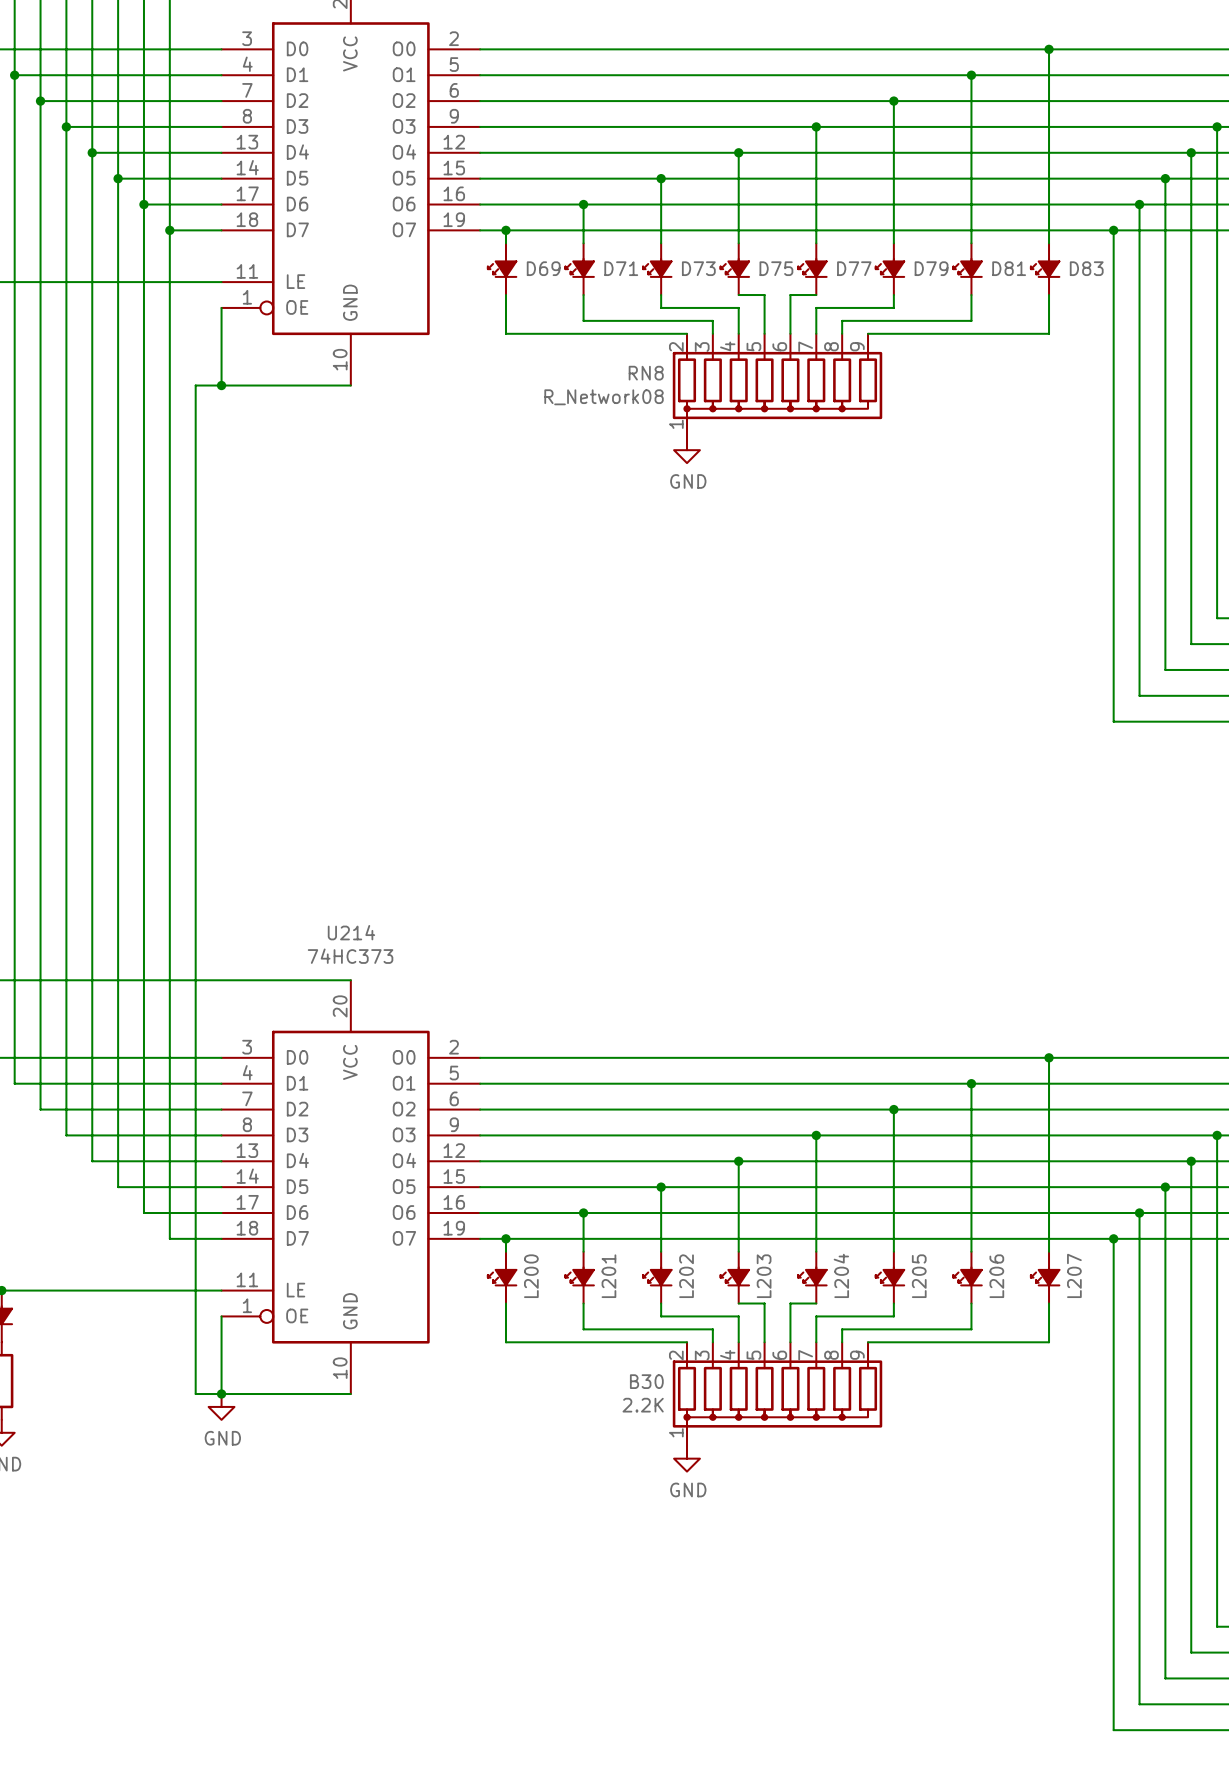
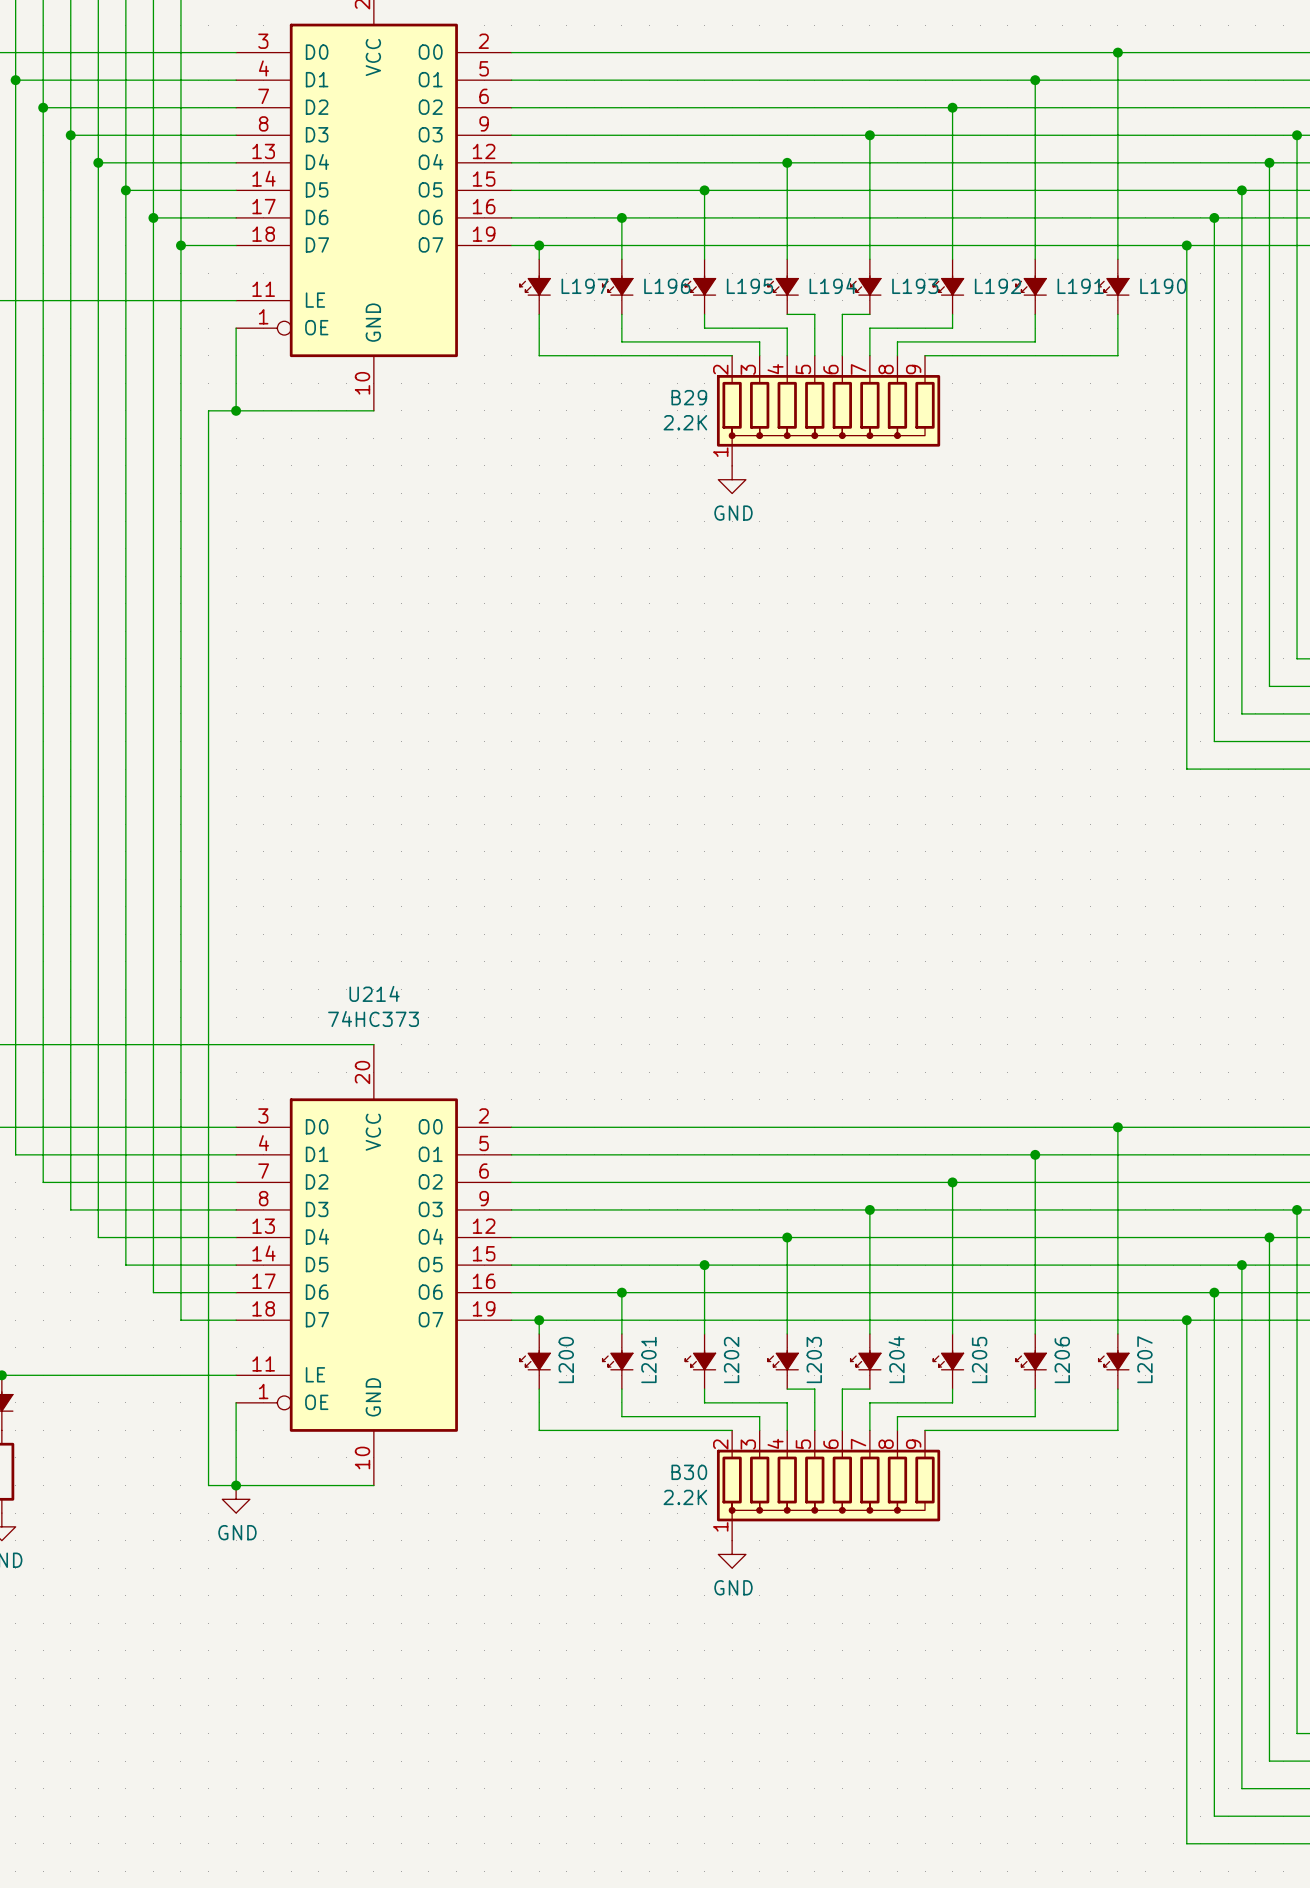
D69 name: D69 (543, 268) -> L197 (584, 286)
D71 name: D71 (621, 268) -> L196 (667, 286)
D73 name: D73 (698, 268) -> L195 (749, 286)
D75 name: D75 (776, 268) -> L194 (832, 285)
D77 name: D77 (854, 268) -> L193 (915, 286)
D79 name: D79 (931, 268) -> L192 (997, 286)
D81 name: D81 (1009, 268) -> L191 (1080, 286)
D83 name: D83 (1086, 268) -> L190 (1163, 286)
RN8 name: RN8 (646, 373) -> B29 (689, 397)
RN8 value: R_Network08 (604, 397) -> 2.2K (685, 422)

